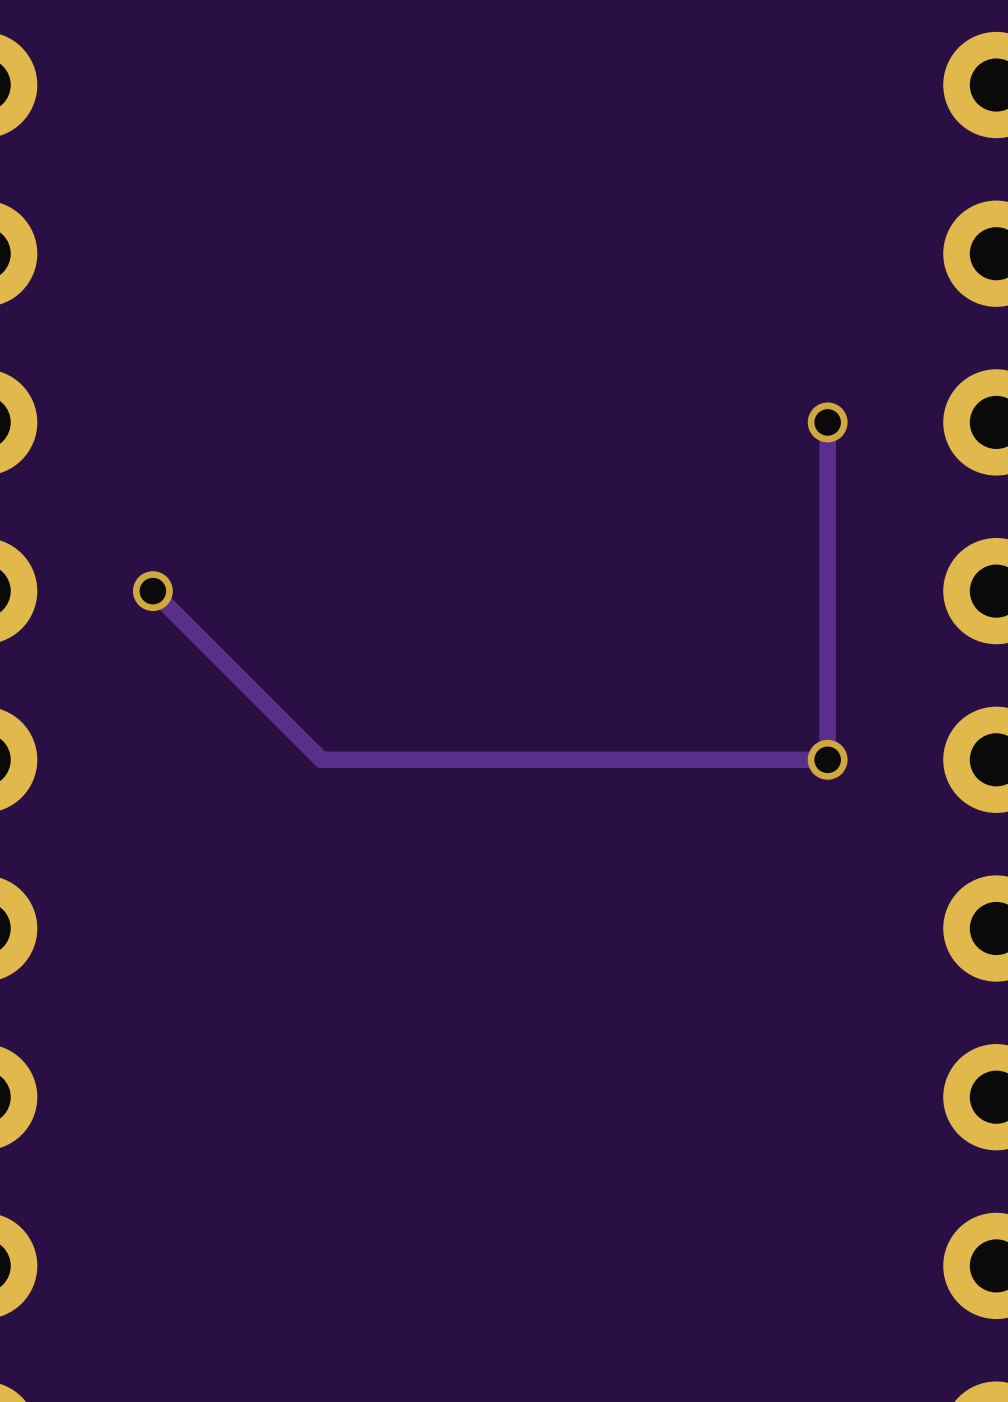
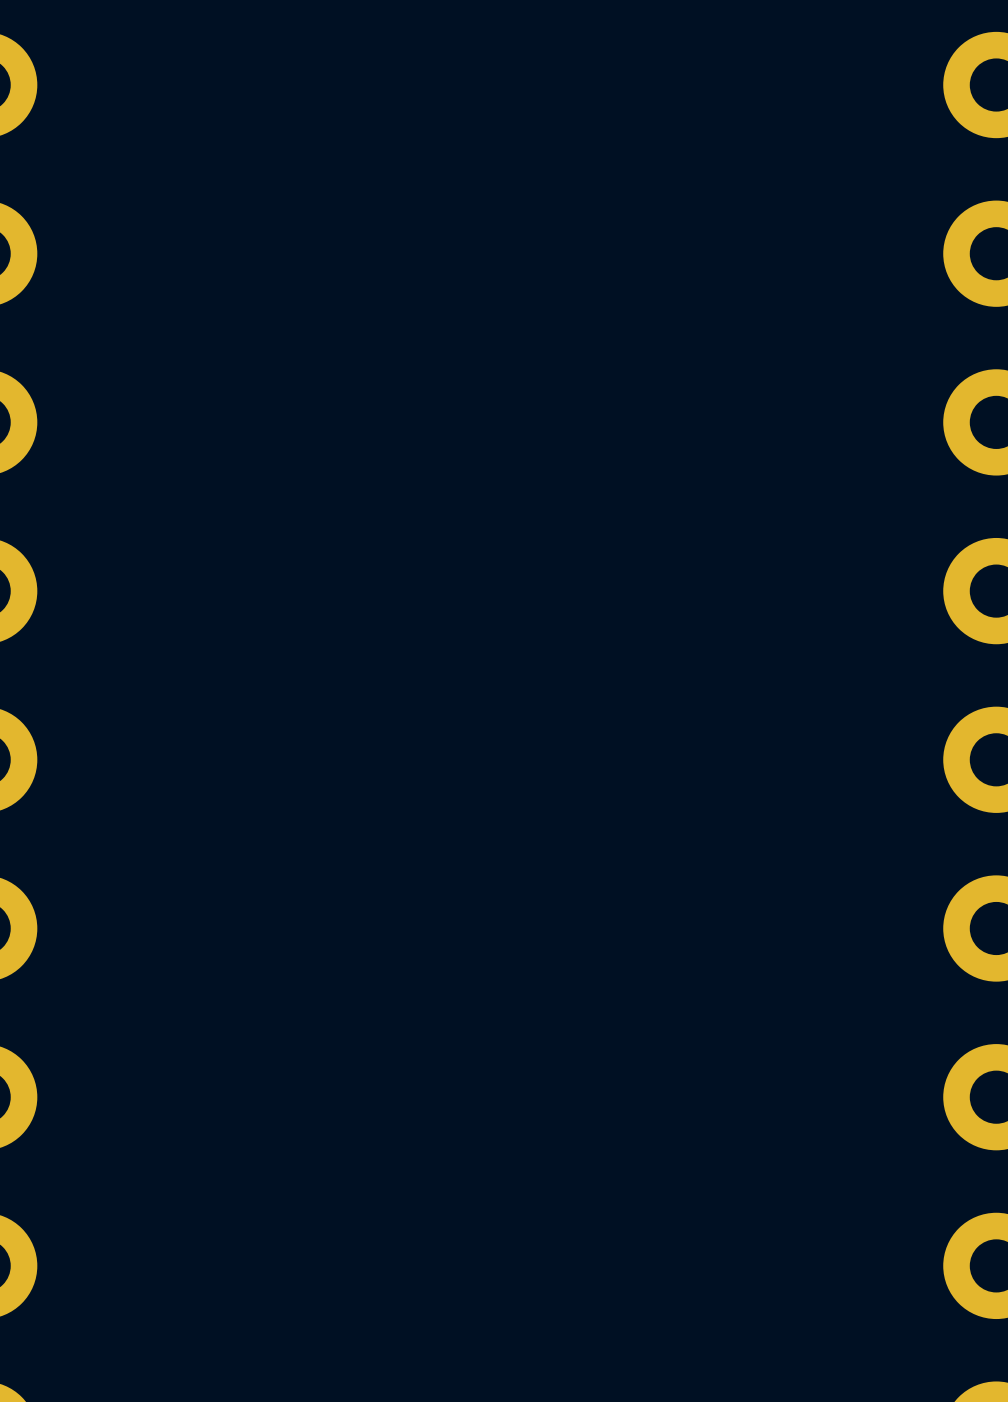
track: (827, 422) (827, 759) (321, 759) (152, 591) -> none
via: (827, 422) -> none
via: (152, 591) -> none
via: (827, 759) -> none

